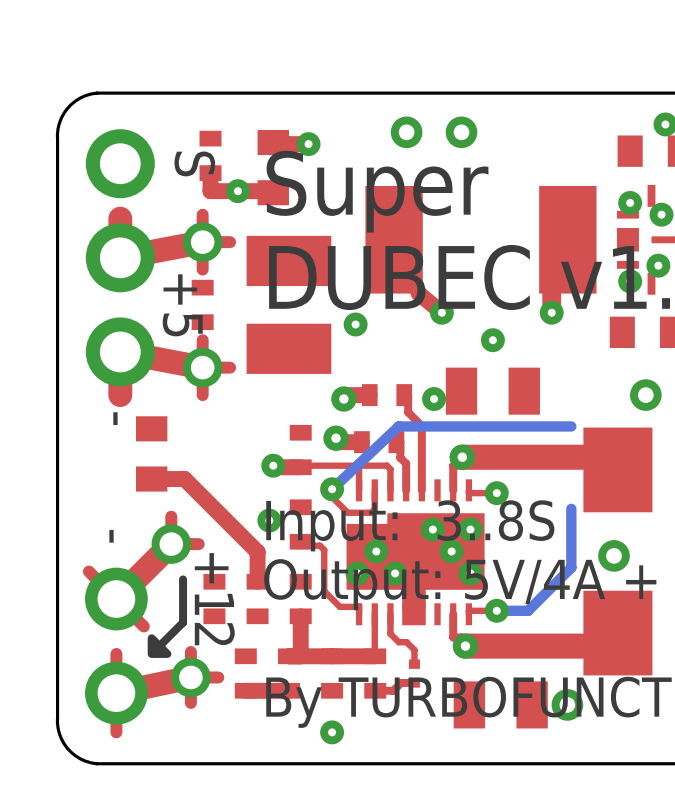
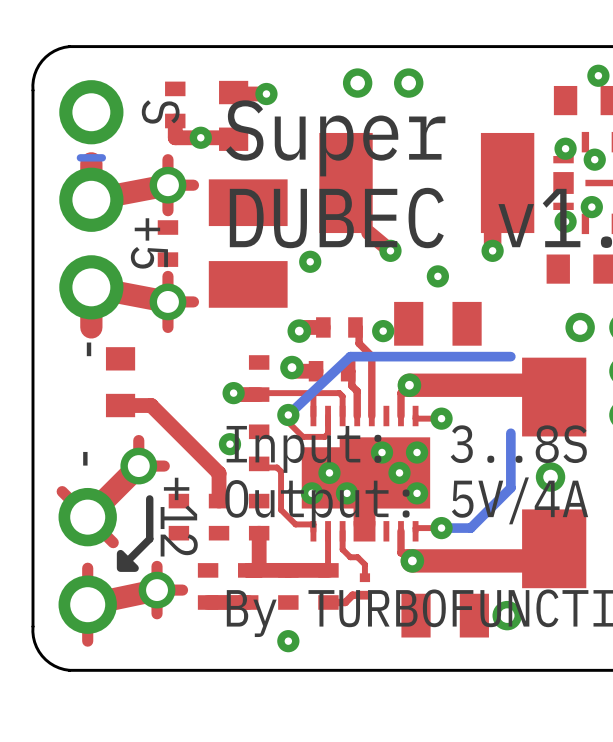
bottom track: none -> (102, 157) (80, 157)

